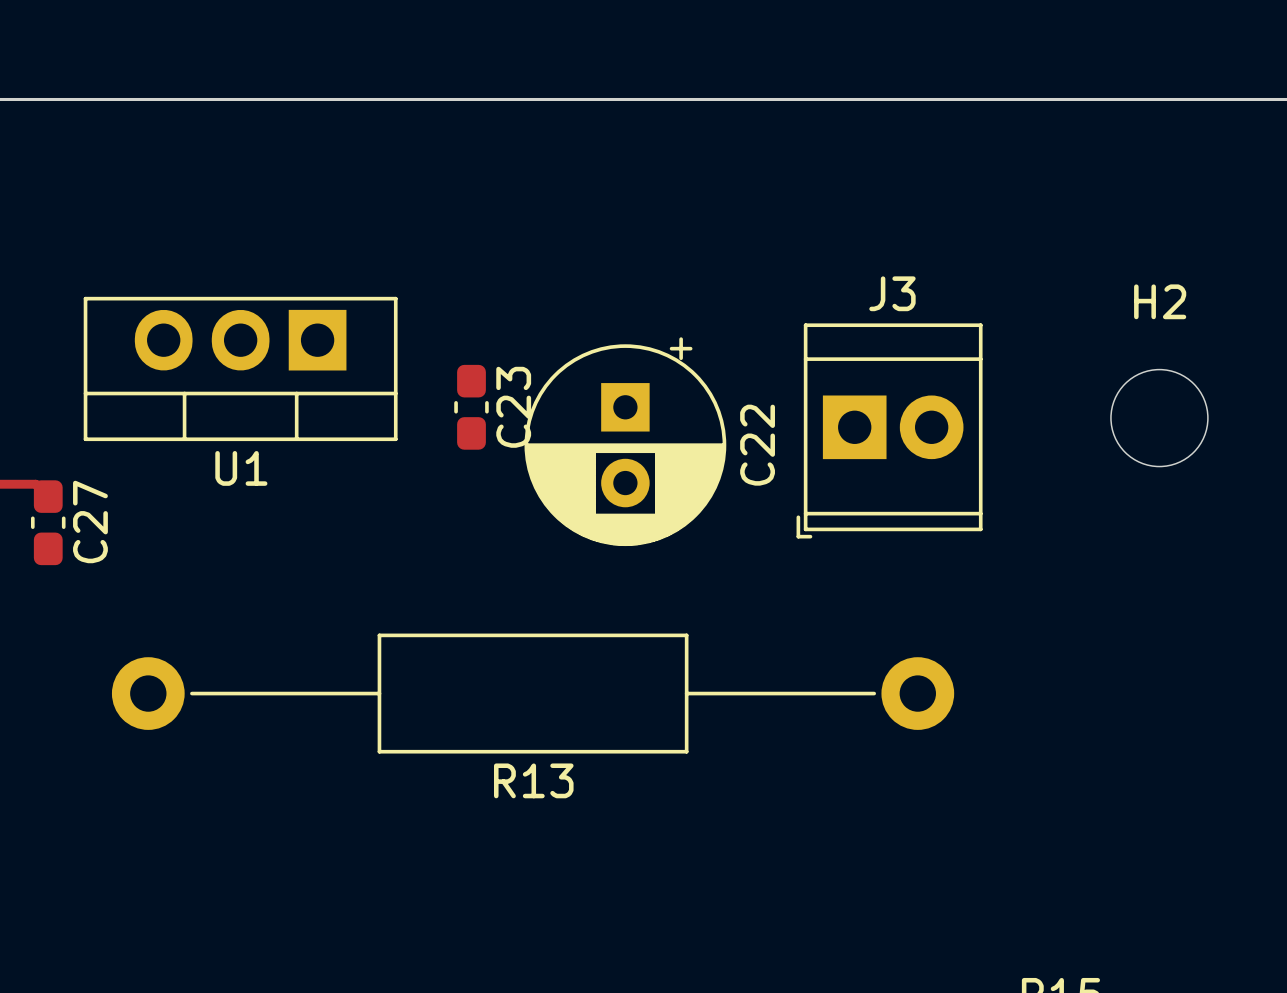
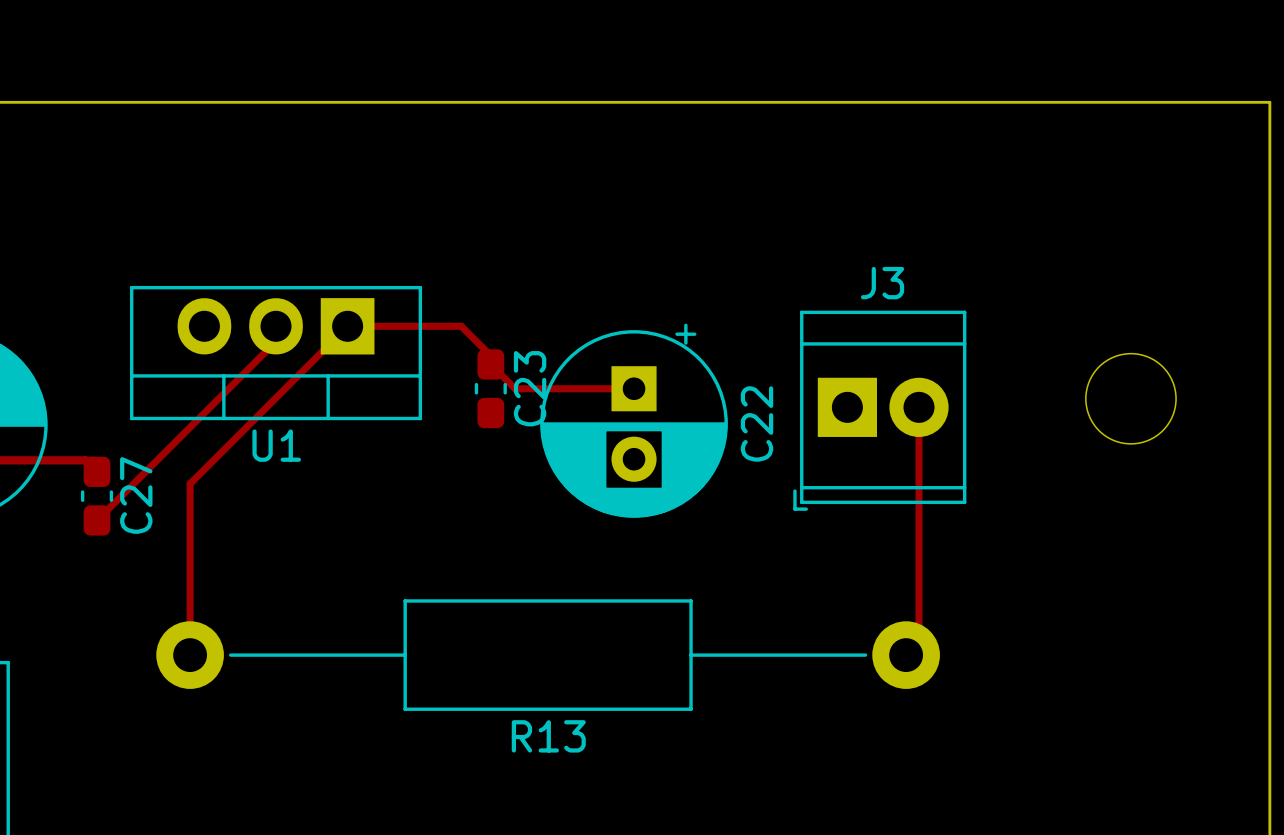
H2 name: H2 (1160, 301) -> none
top track: none -> (276, 326) (276, 341) (97, 520)
top track: none -> (634, 388) (515, 388) (490, 364) (490, 355) (461, 326) (347, 326) (190, 483) (190, 655)
top track: none -> (919, 407) (919, 642) (906, 655)

